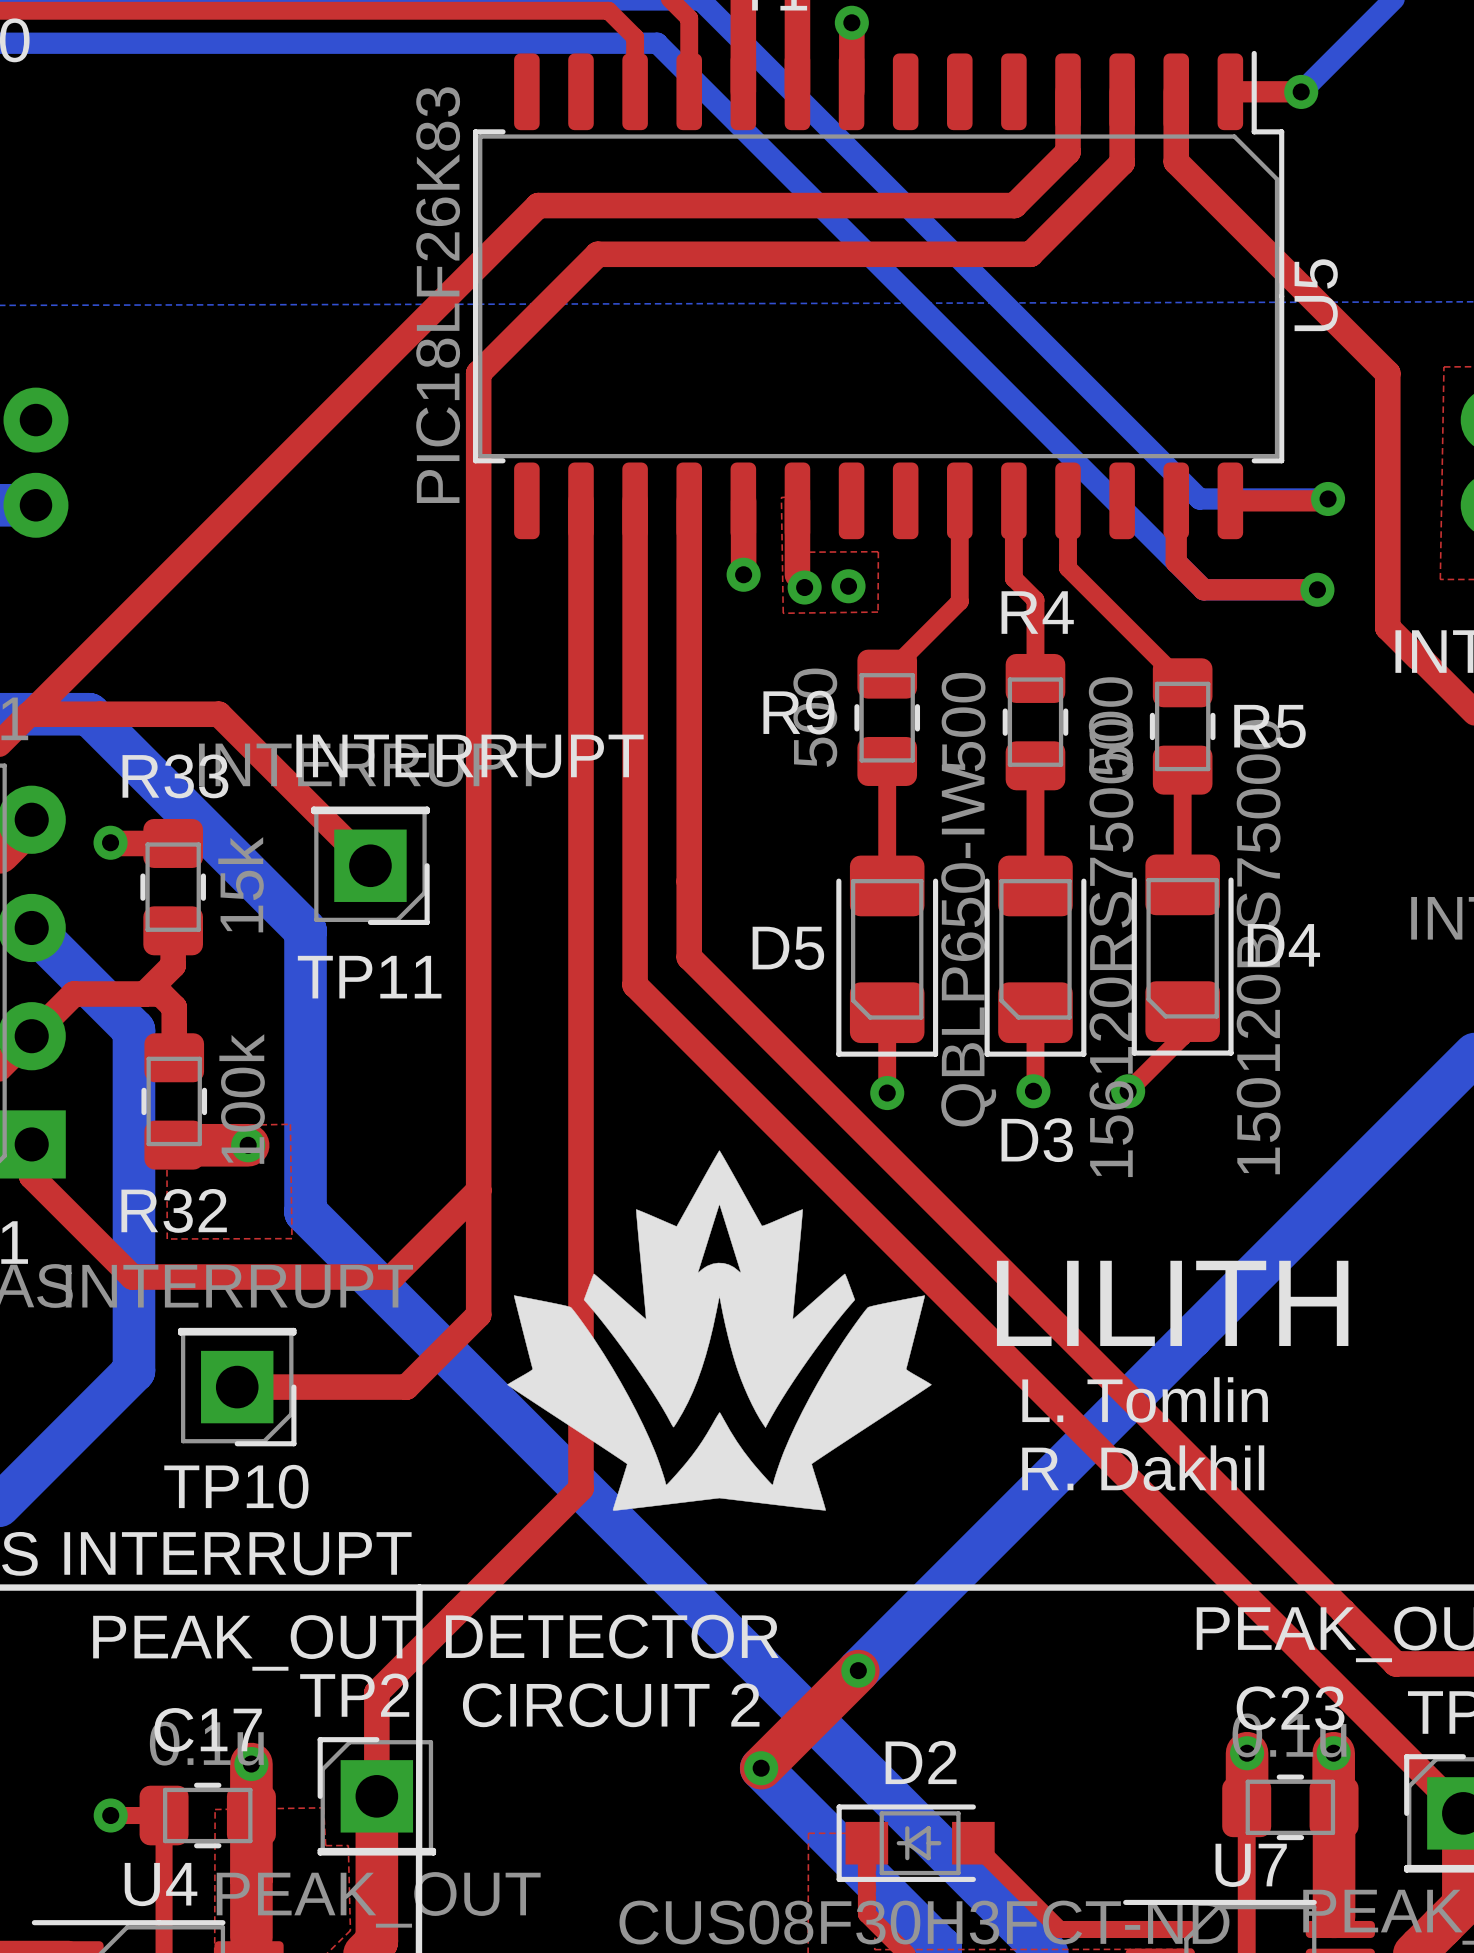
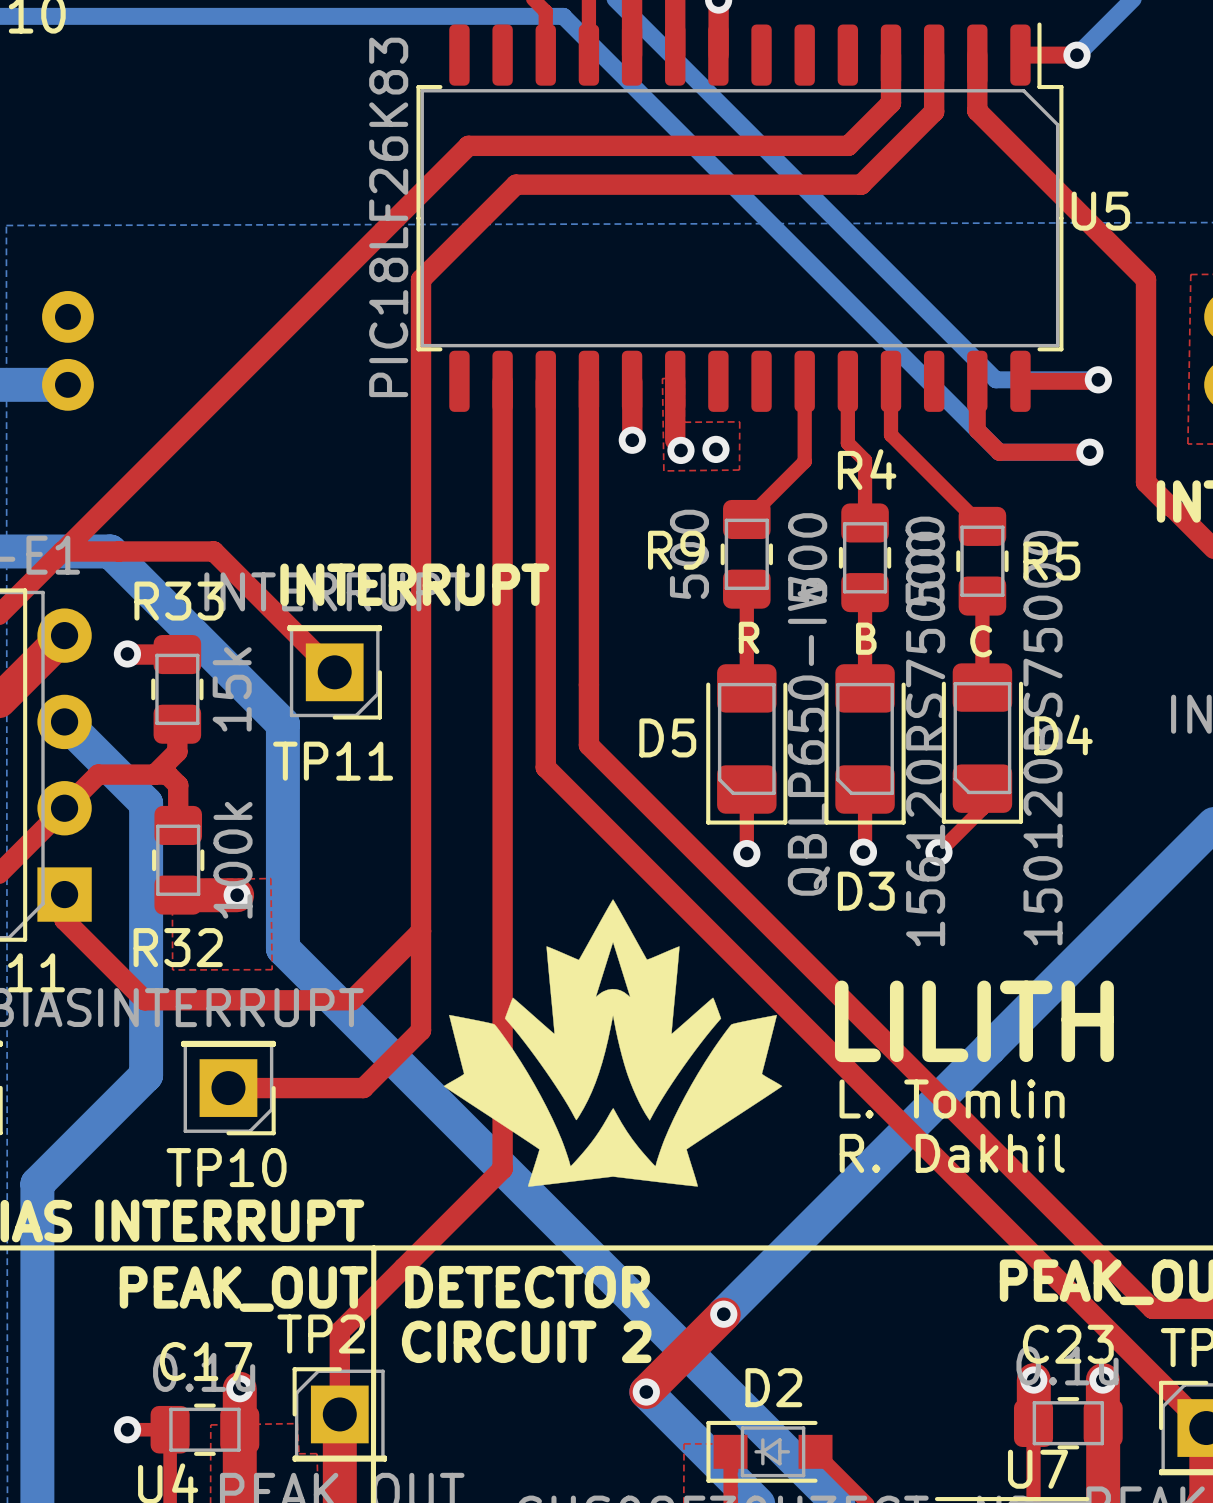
U5 name rotation: 0° (1316, 295) -> 90° clockwise (1100, 211)
text: none -> R (749, 637)
text: none -> B (866, 638)
text: none -> C (981, 641)

